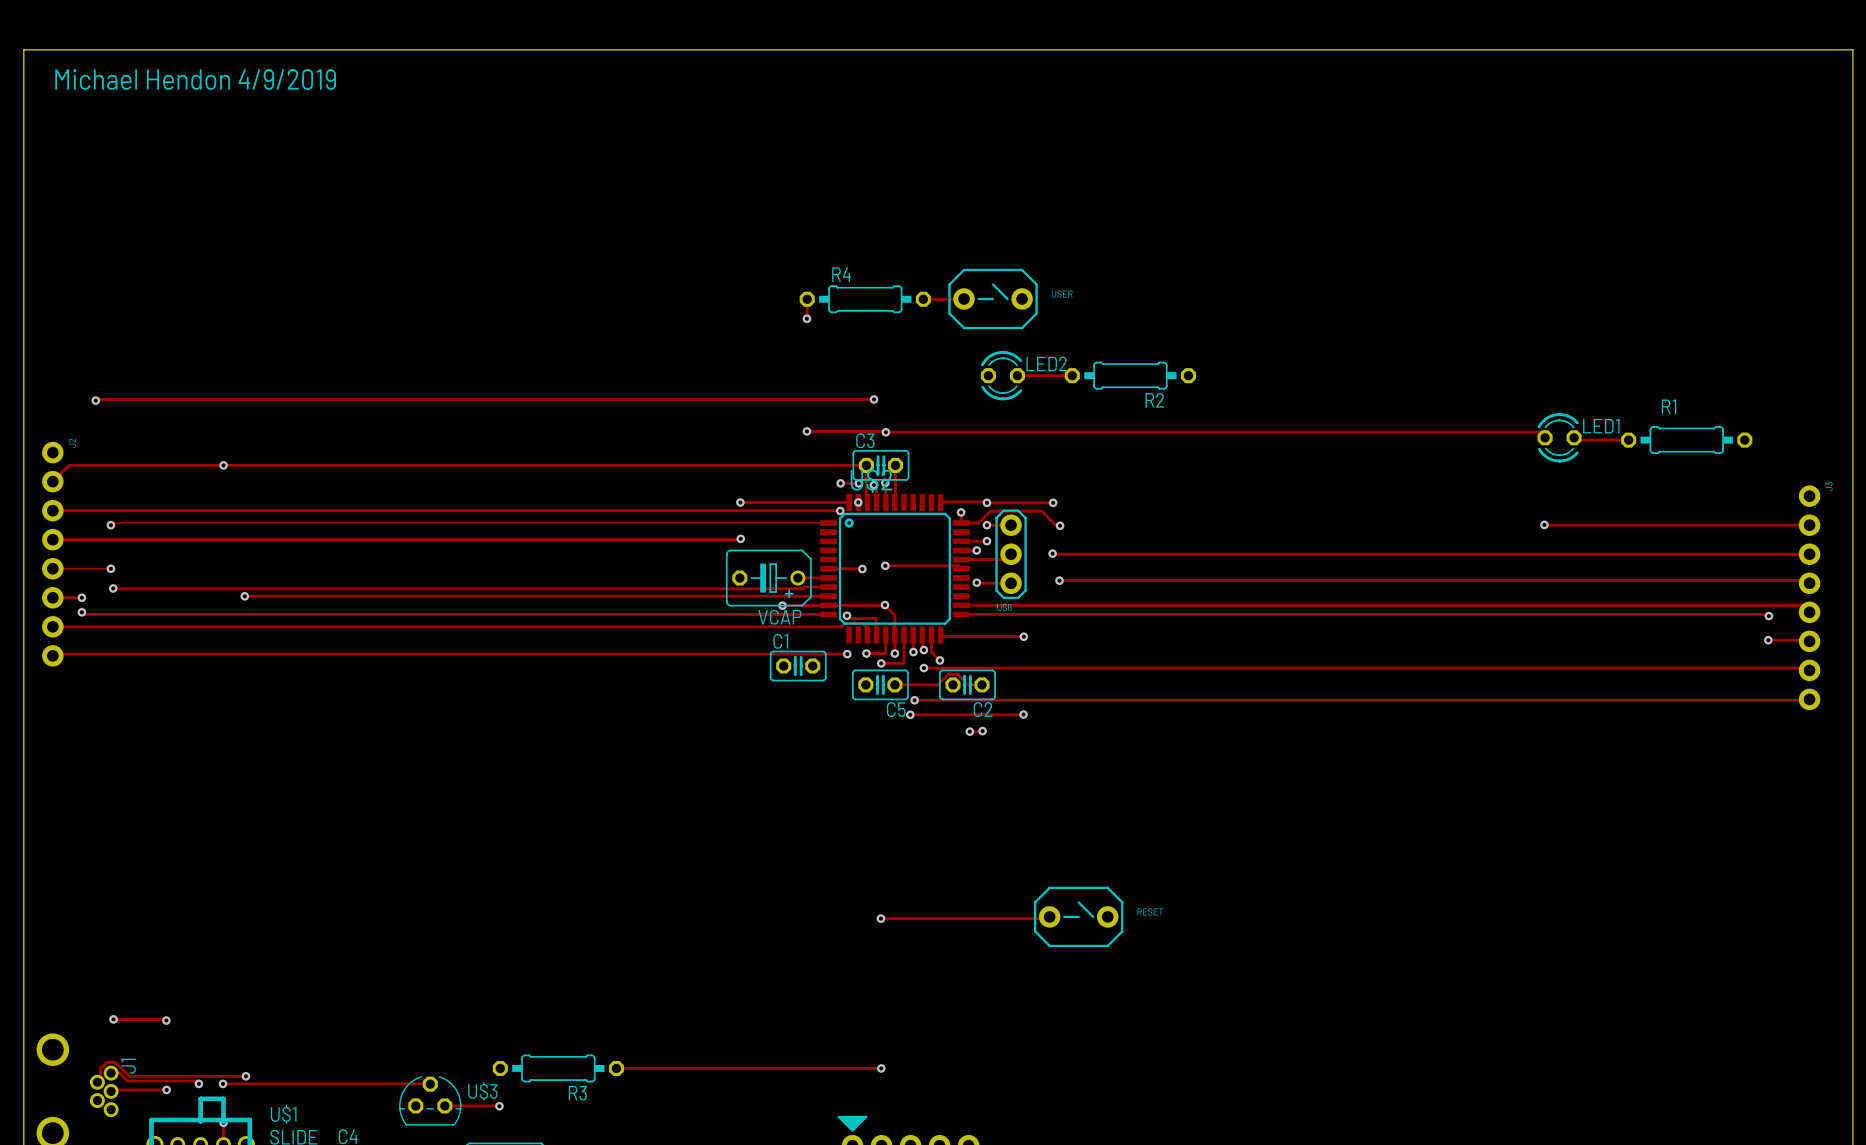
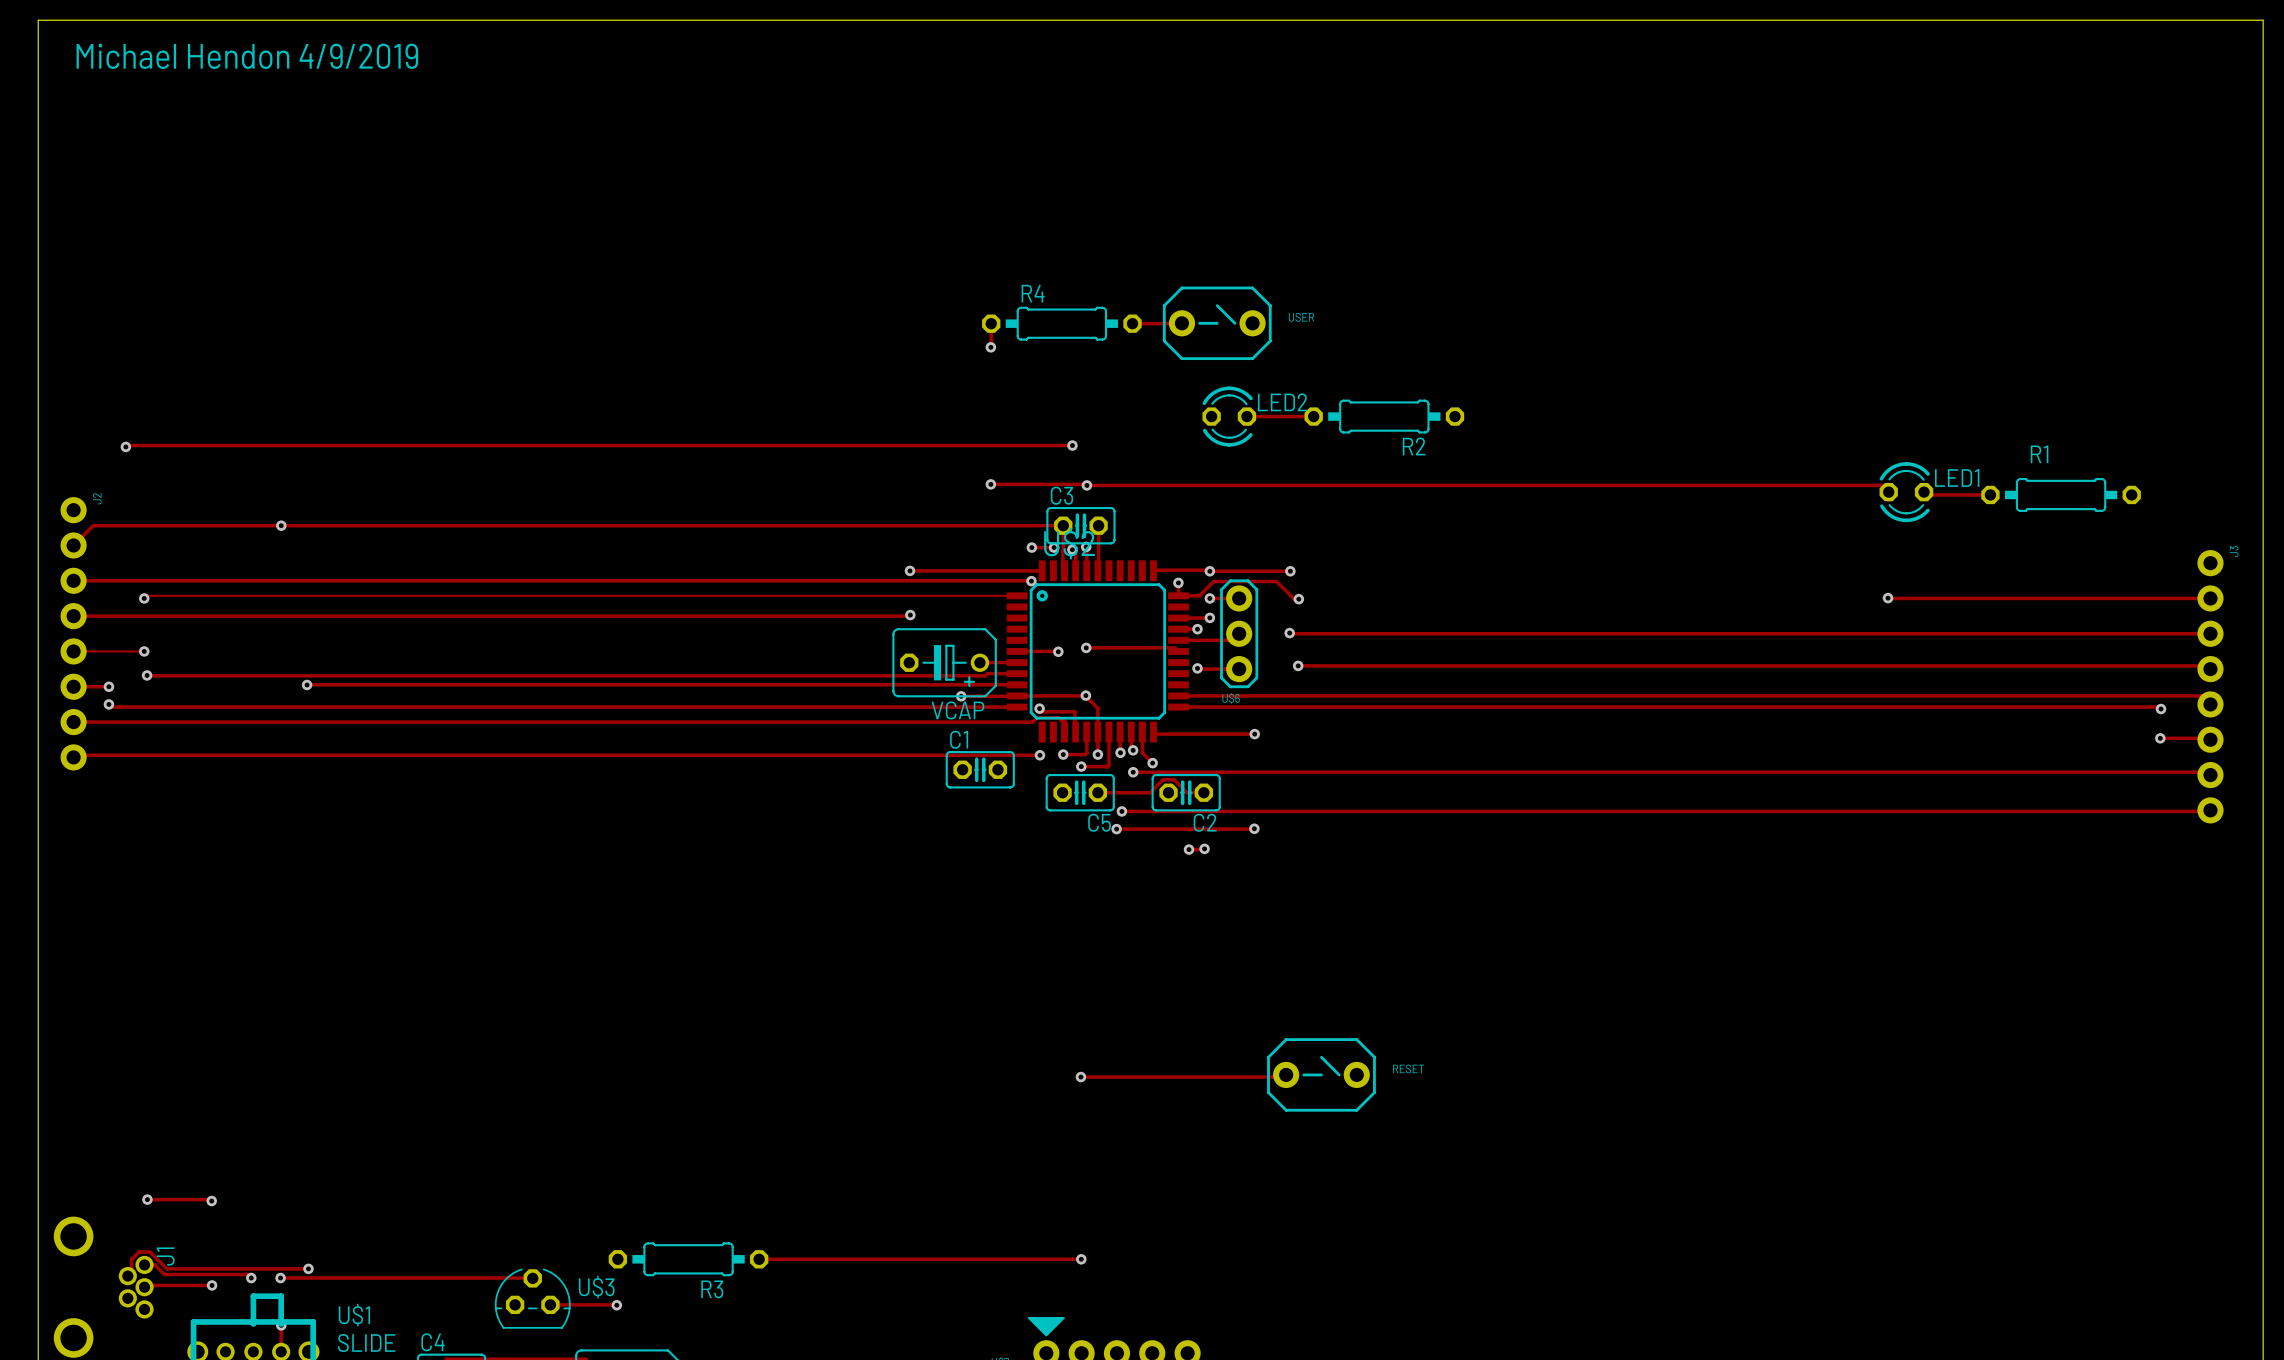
via: (858, 502) -> none

